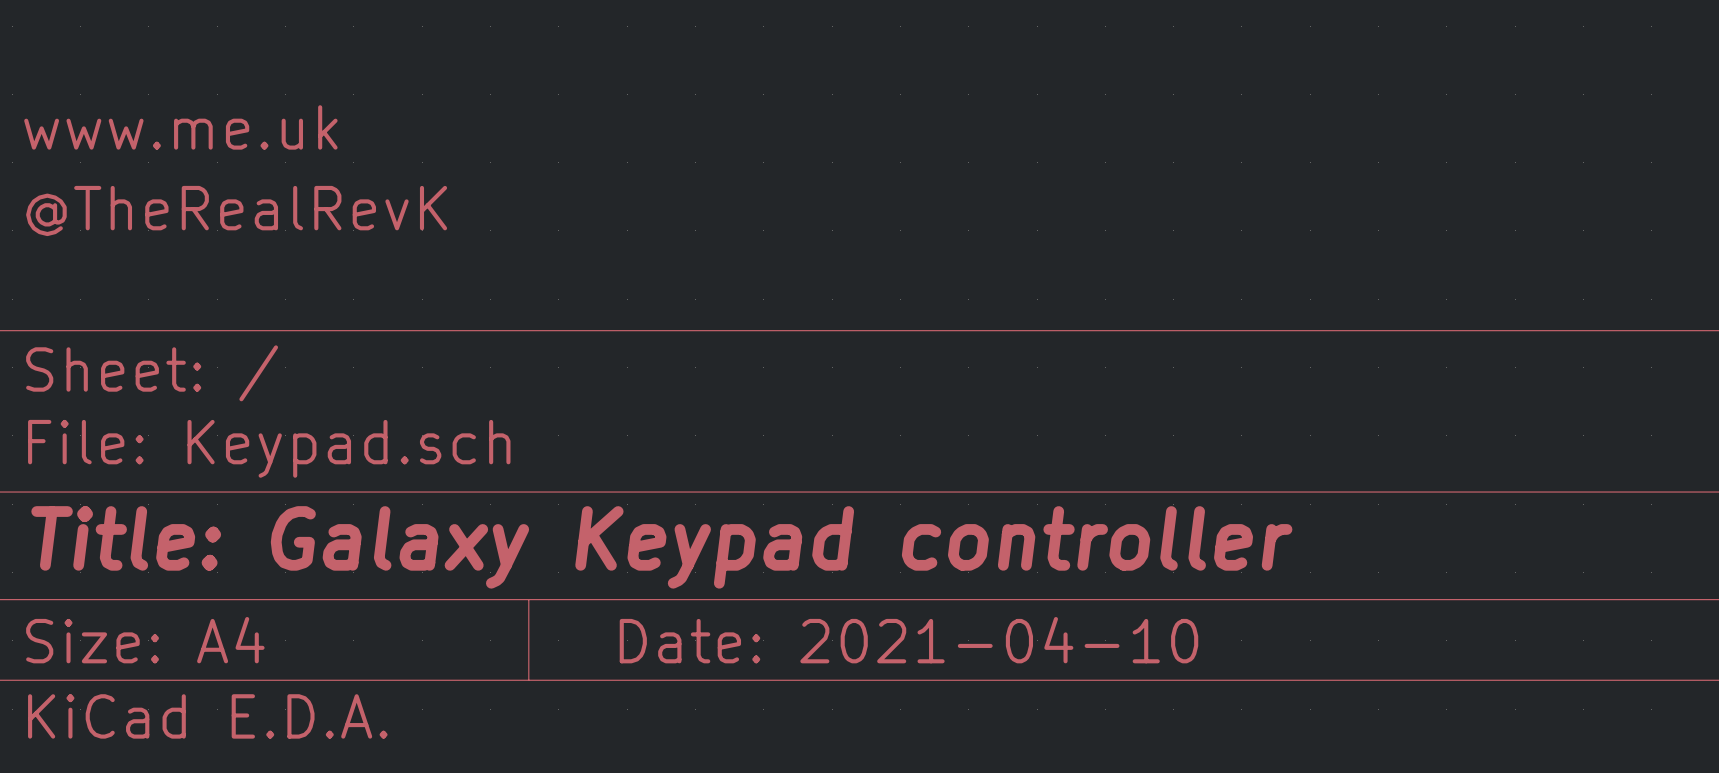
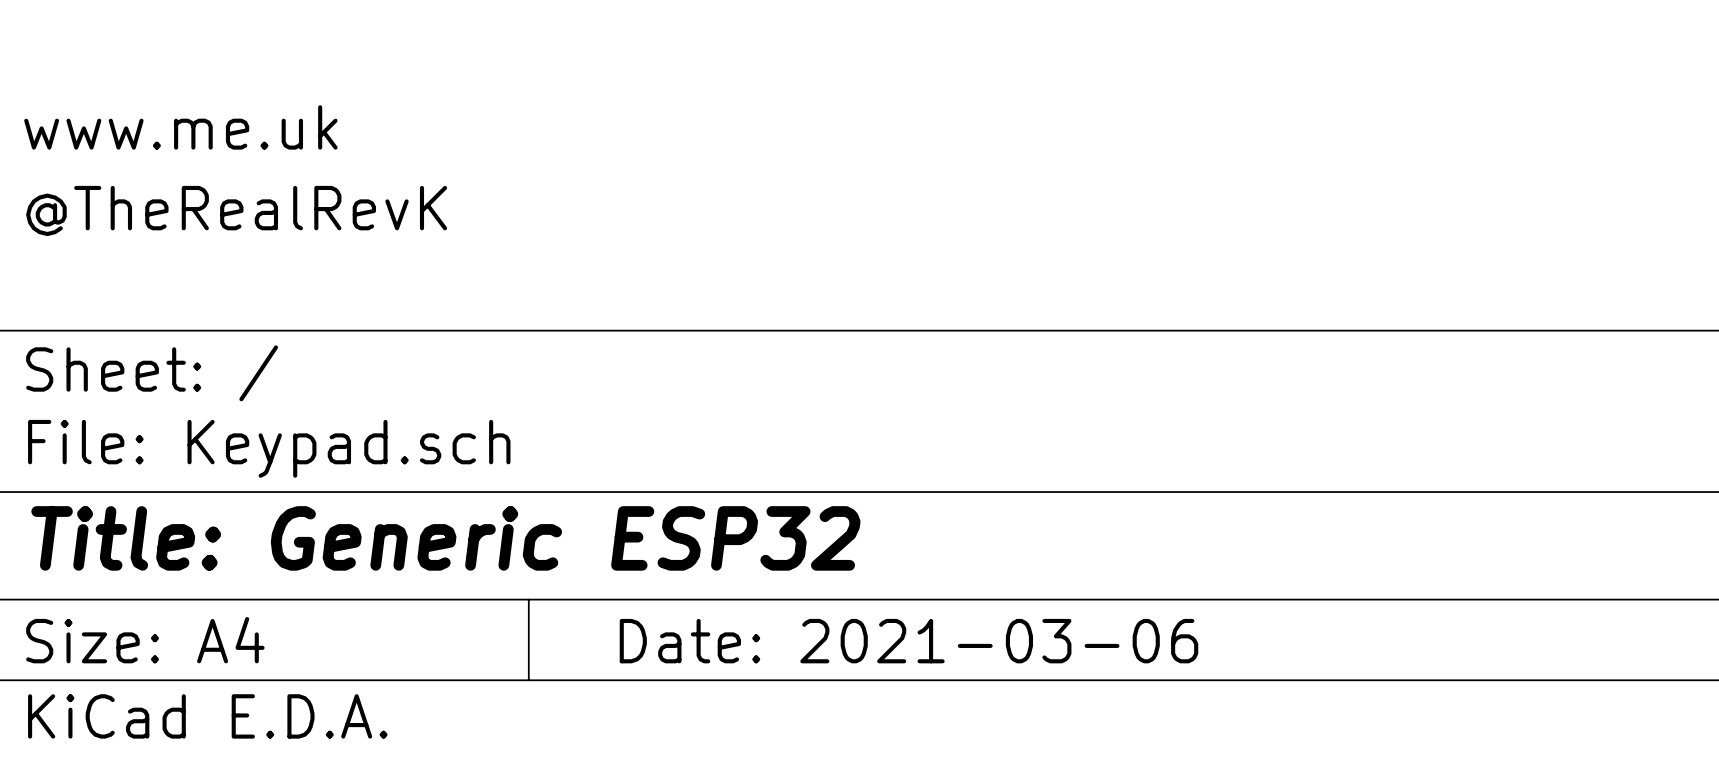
title block: Title: Galaxy Keypad controller (661, 547) -> Title: Generic ESP32 (445, 538)
title block: Date: 2021-04-10 (908, 640) -> Date: 2021-03-06 (908, 641)

